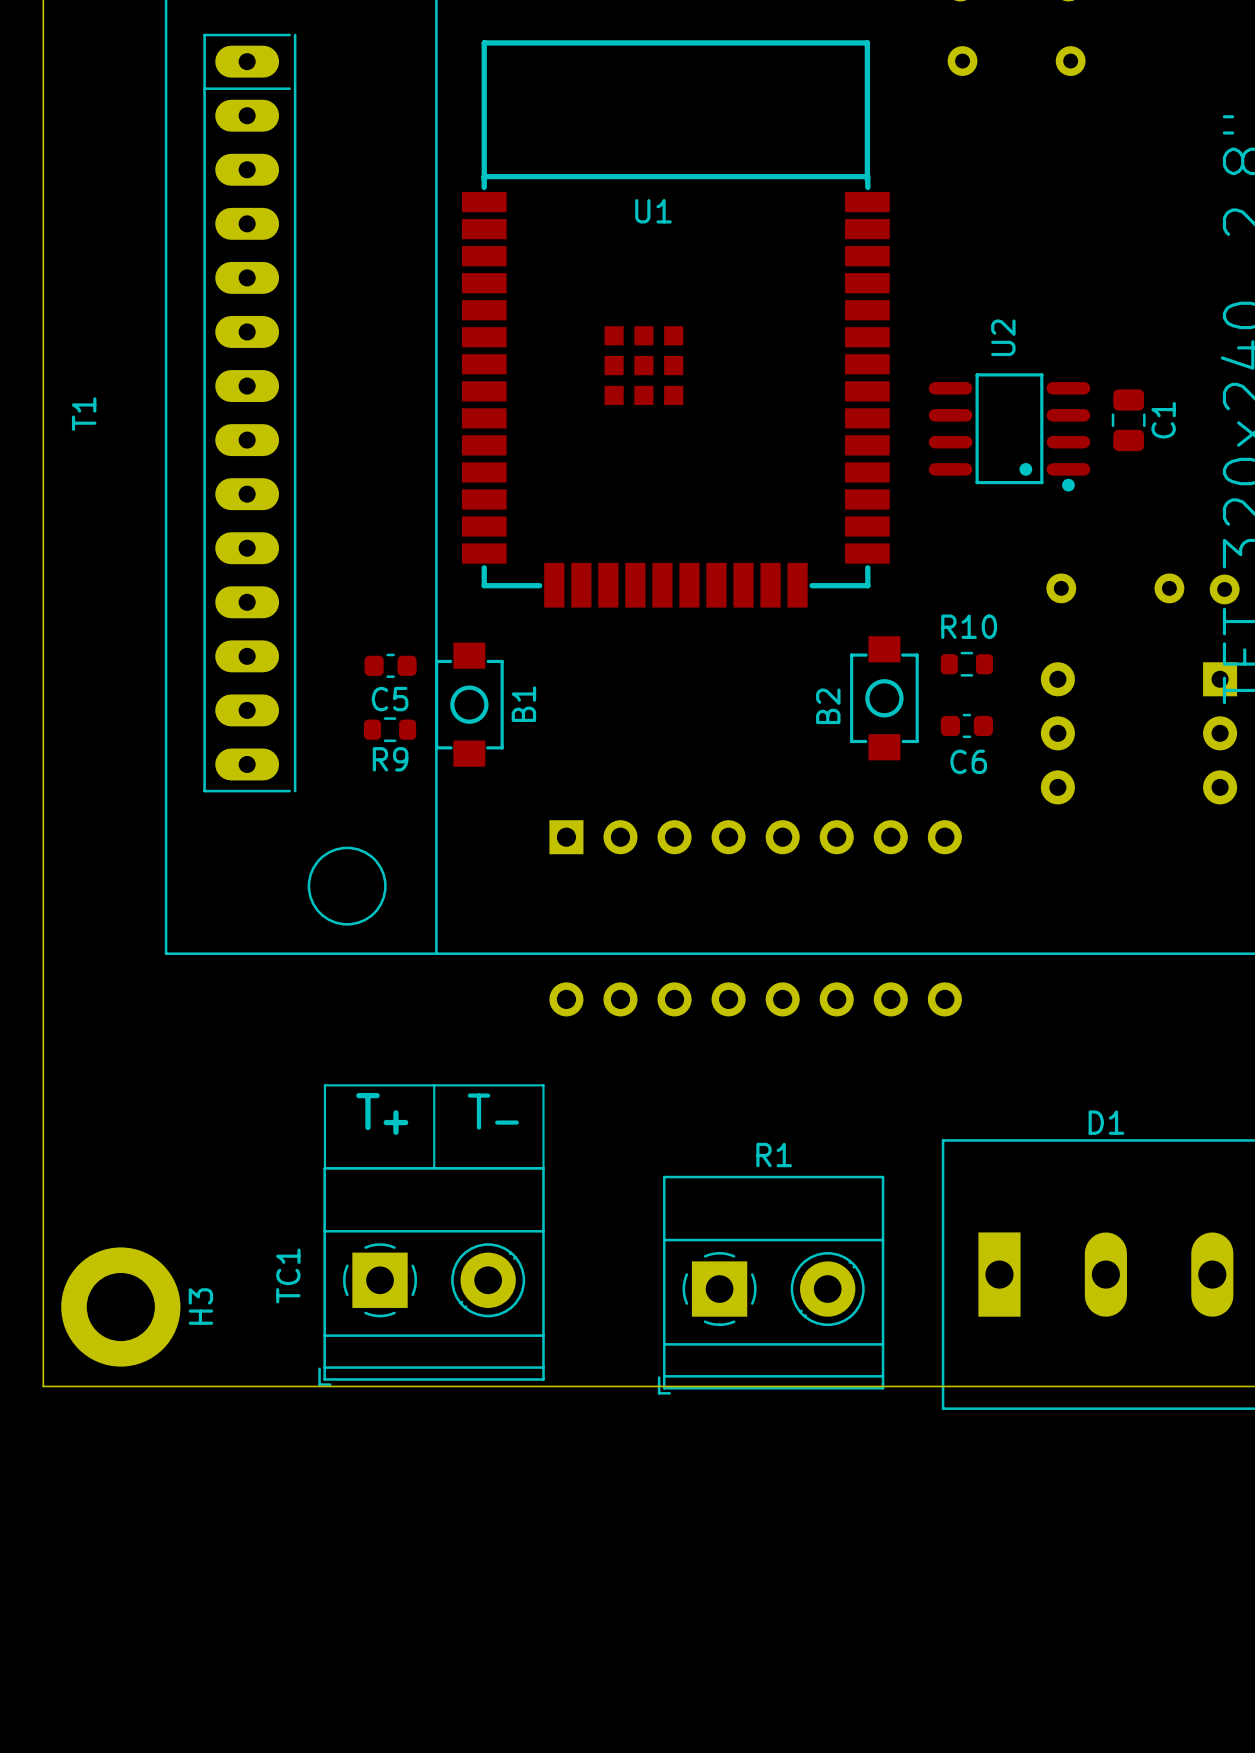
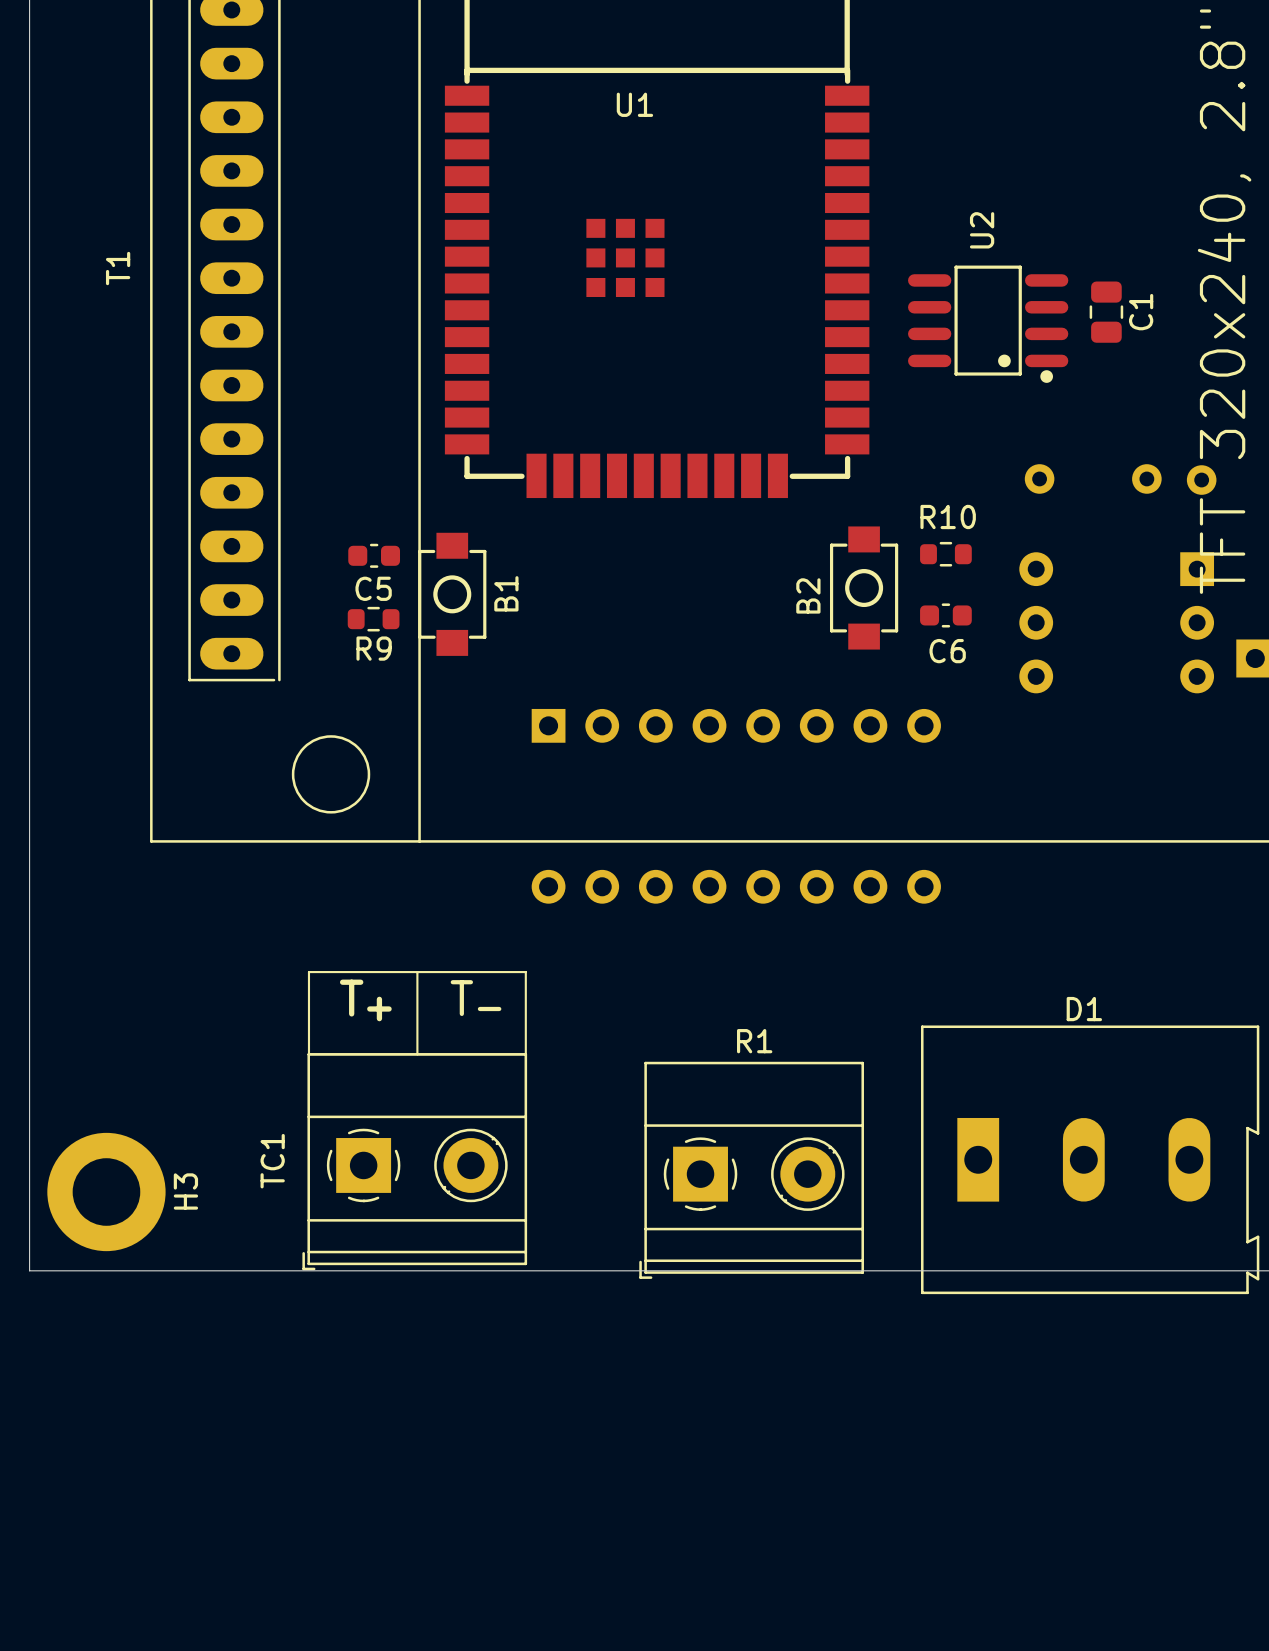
T1 name position: T1 (84, 414) -> T1 (118, 268)

